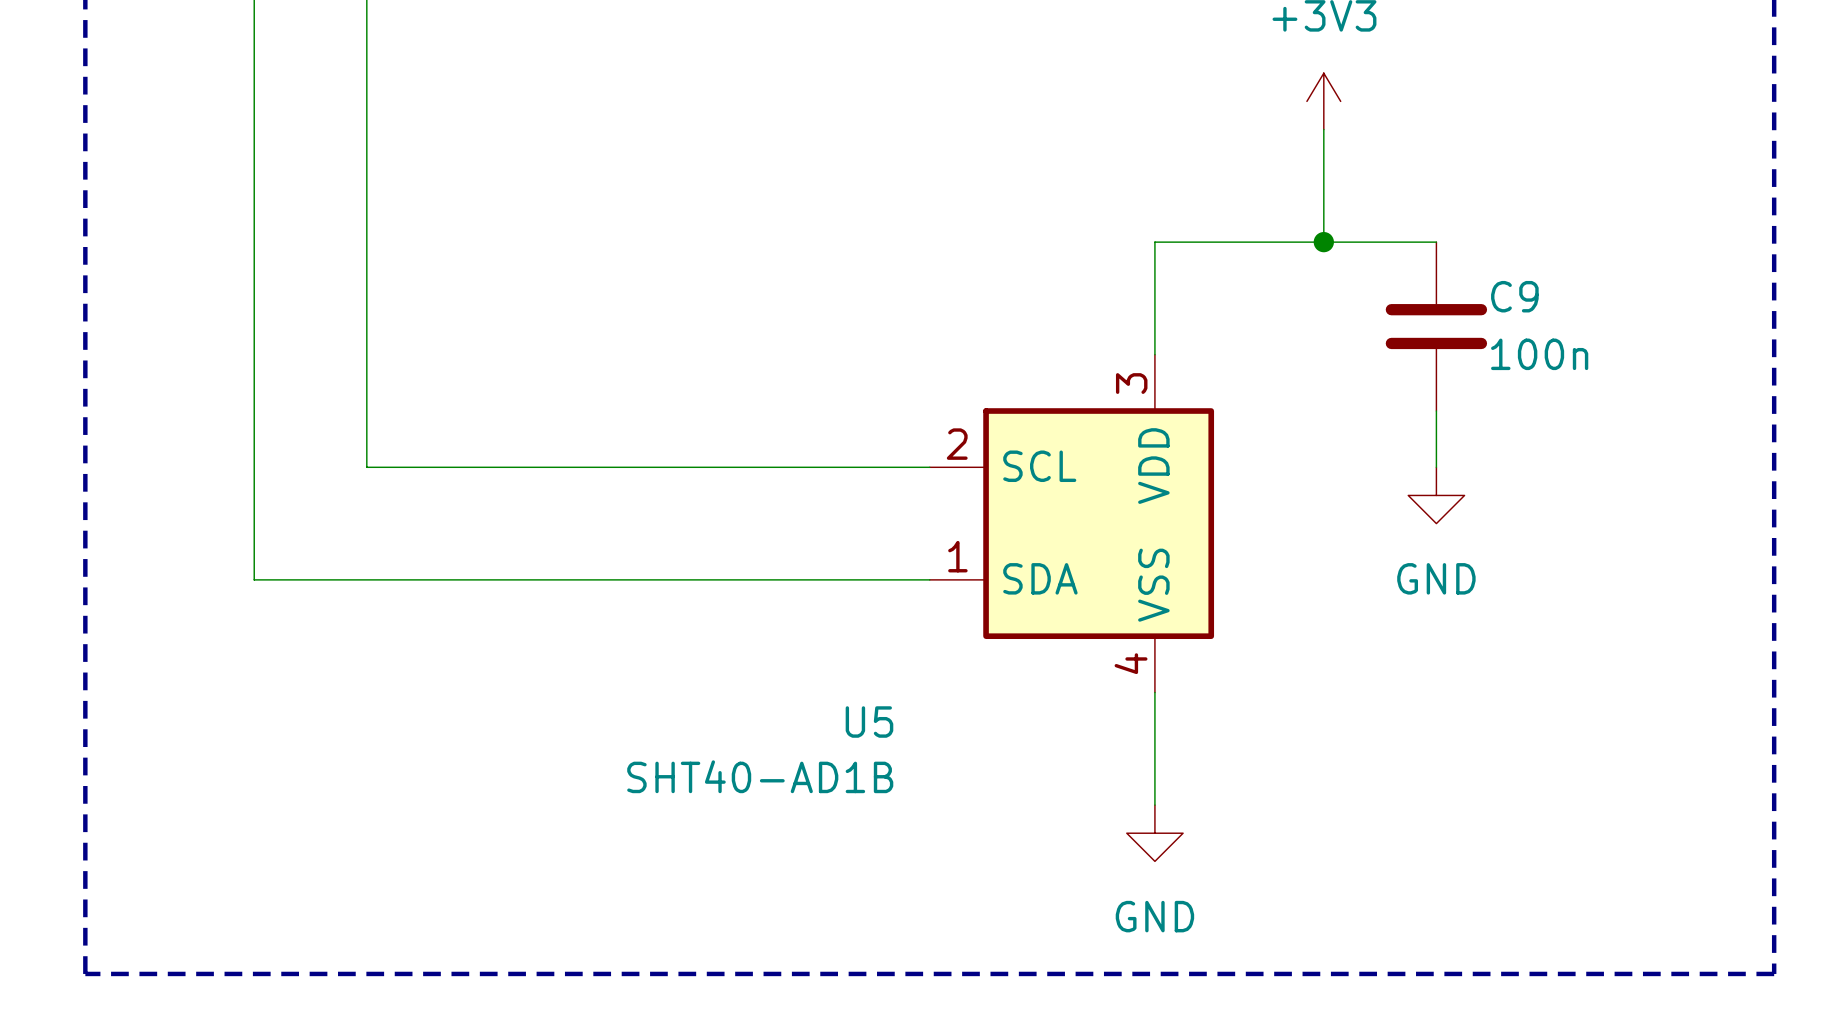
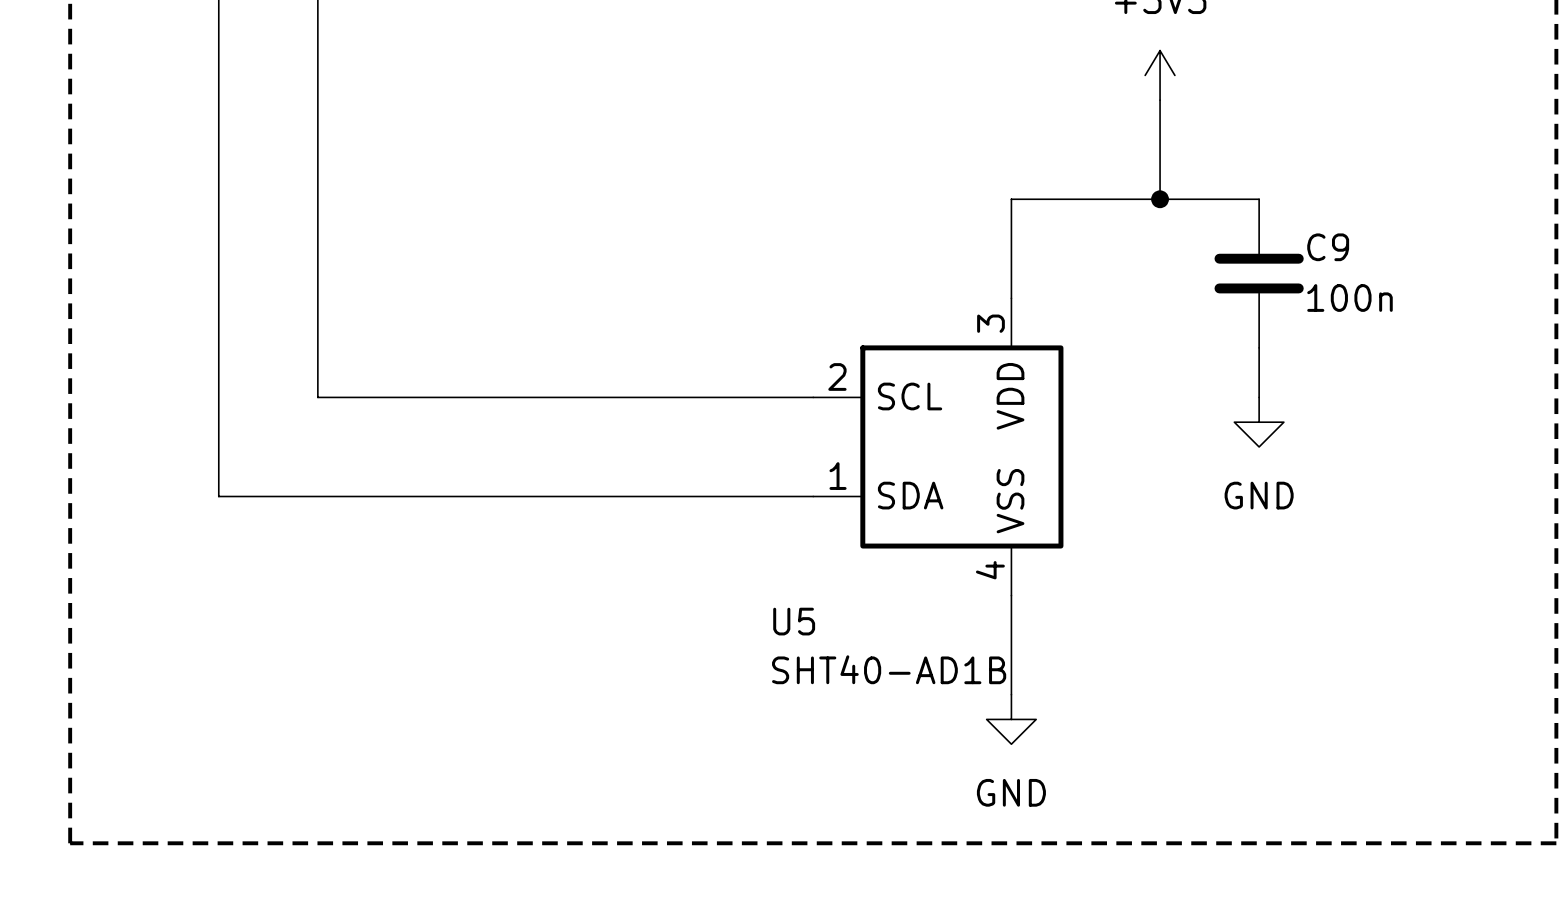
U5 name position: U5 (869, 722) -> U5 (794, 621)
U5 value position: SHT40-AD1B (760, 776) -> SHT40-AD1B (889, 669)

